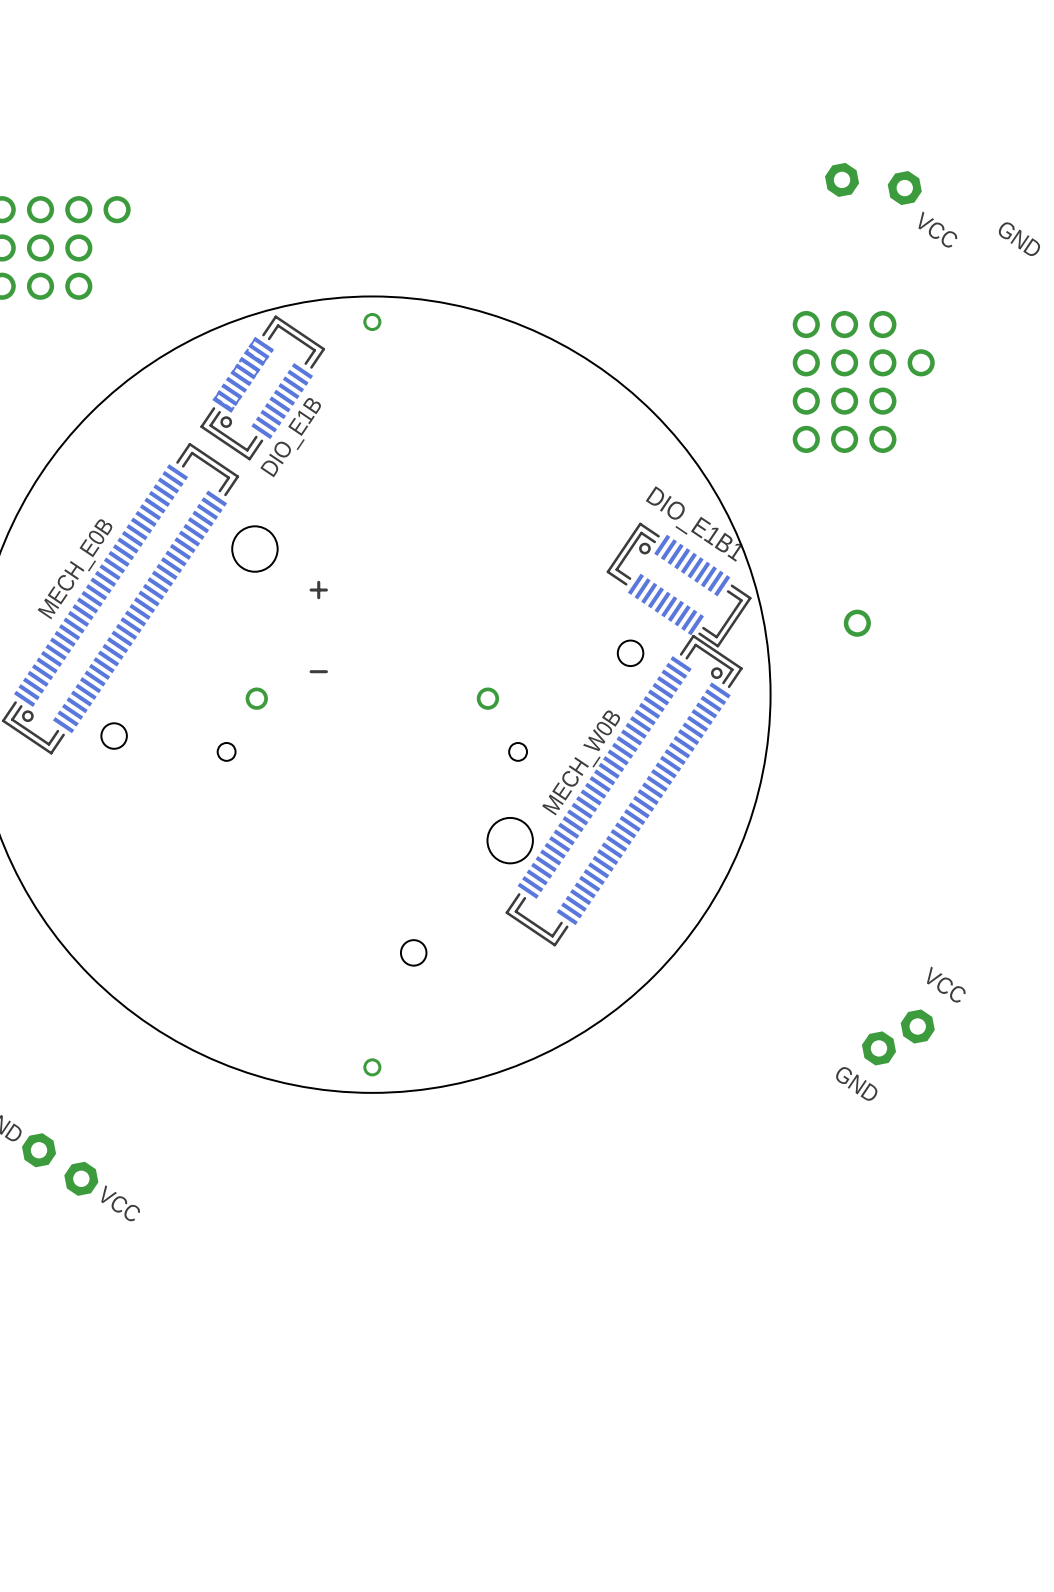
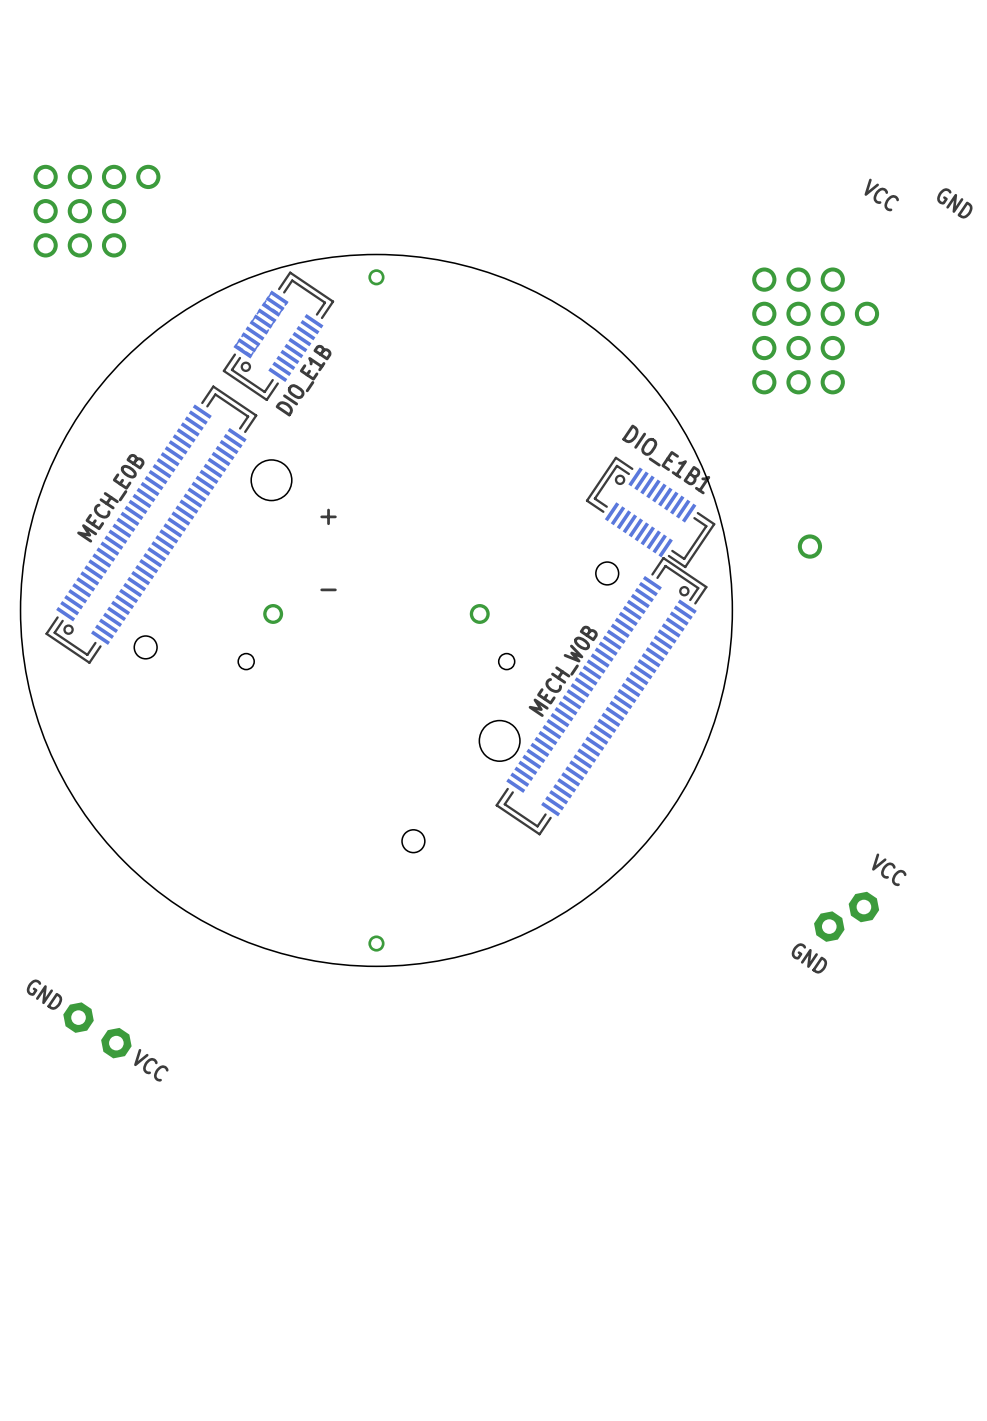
part: (842, 179) -> none
part: (904, 188) -> none

